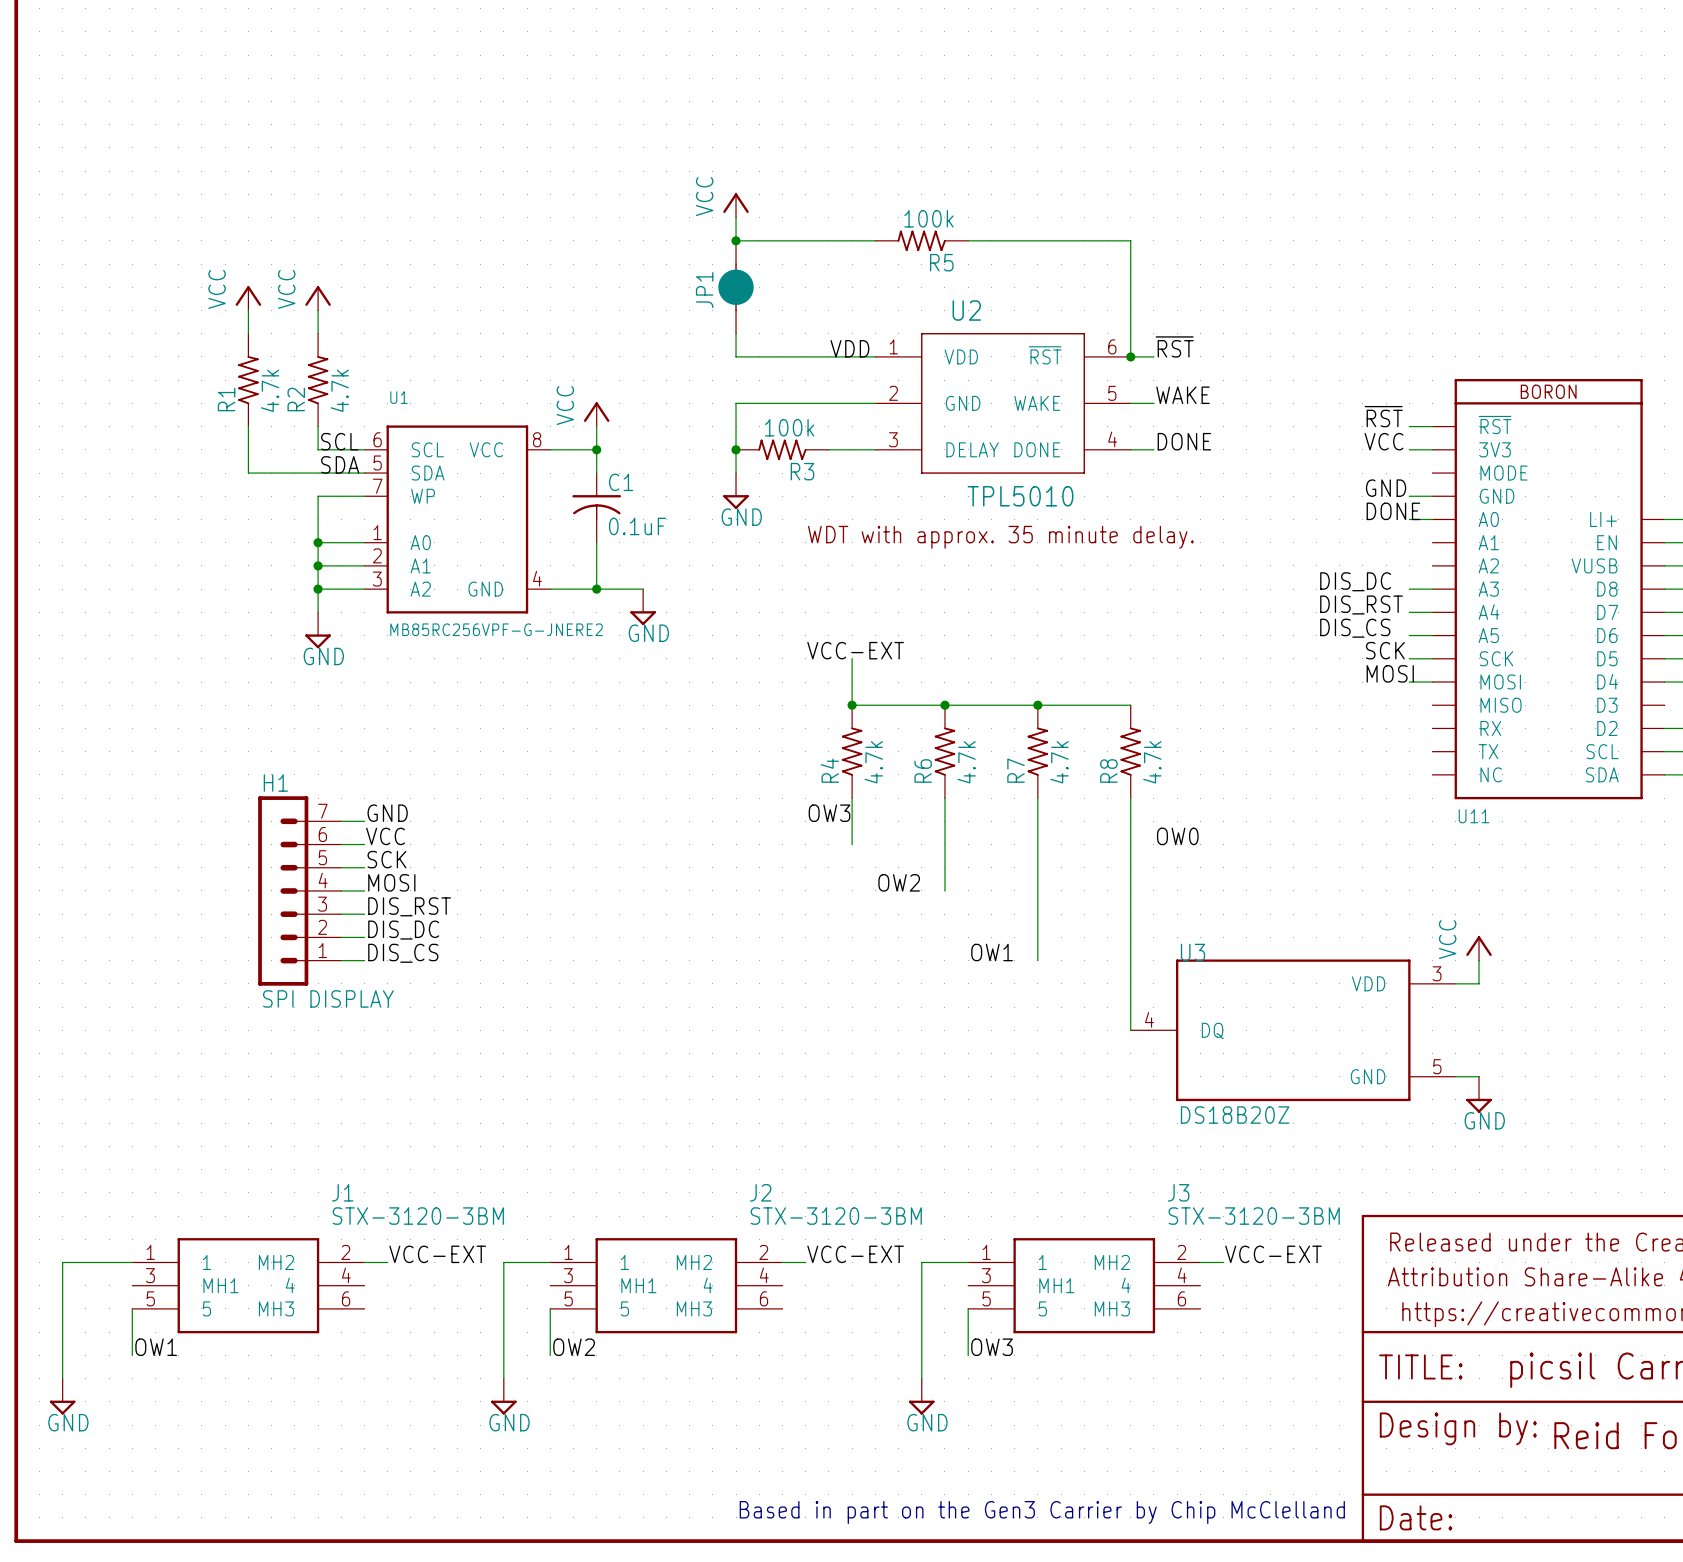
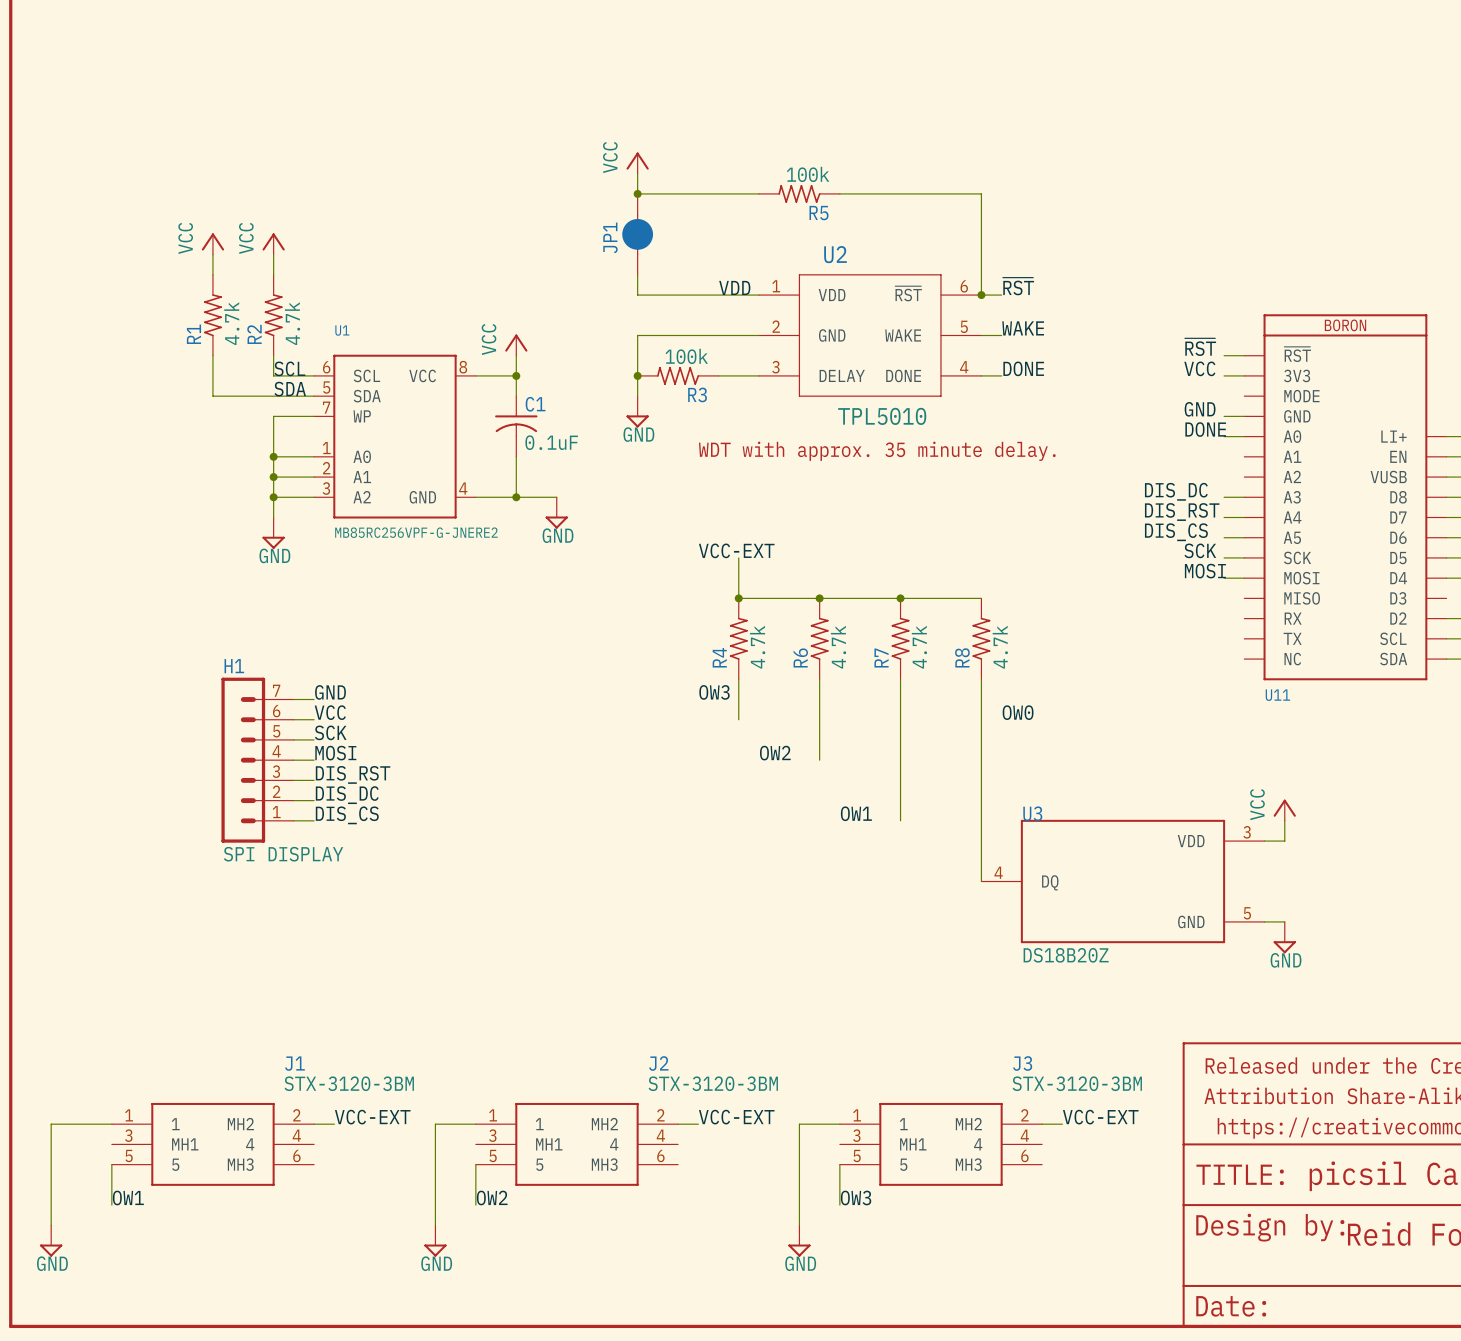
label position: VCC-EXT (437, 1254) -> VCC-EXT (372, 1117)
label position: VCC-EXT (855, 1254) -> VCC-EXT (736, 1117)
label position: VCC-EXT (1273, 1254) -> VCC-EXT (1100, 1117)
wire: (132, 1262) (62, 1262) (62, 1308) -> (111, 1124) (51, 1124)
wire: (364, 1262) (387, 1262) -> (314, 1124) (334, 1124)
wire: (550, 1262) (503, 1262) (503, 1308) -> (475, 1124) (435, 1124)
wire: (782, 1262) (805, 1262) -> (678, 1124) (698, 1124)
wire: (968, 1262) (921, 1262) (921, 1308) -> (839, 1124) (799, 1124)
wire: (1200, 1262) (1223, 1262) -> (1042, 1124) (1062, 1124)
J1 position: (248, 1285) -> (212, 1144)
J2 position: (666, 1285) -> (576, 1144)
J3 position: (1084, 1285) -> (940, 1144)
wire: (132, 1308) (132, 1355) -> (111, 1205) (111, 1164)
wire: (550, 1308) (550, 1355) -> (475, 1205) (475, 1164)
wire: (968, 1308) (968, 1355) -> (839, 1205) (839, 1164)
label position: OW1 (156, 1347) -> OW1 (128, 1197)
label position: OW2 (574, 1347) -> OW2 (492, 1197)
label position: OW3 (992, 1347) -> OW3 (856, 1197)
power symbol position: GND (62, 1396) -> GND (51, 1240)
power symbol position: GND (503, 1396) -> GND (435, 1240)
power symbol position: GND (921, 1396) -> GND (799, 1240)
text: Based in part on the Gen3 Carrier by Chip McClelland (1042, 1512) -> none

